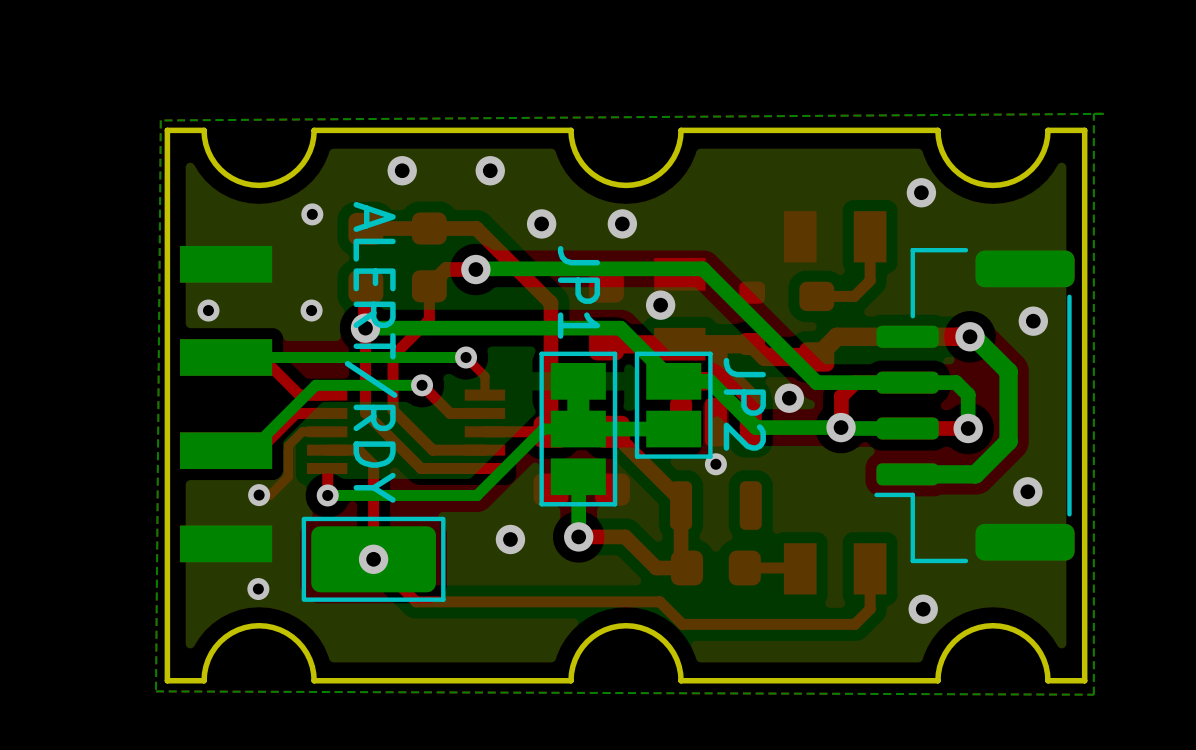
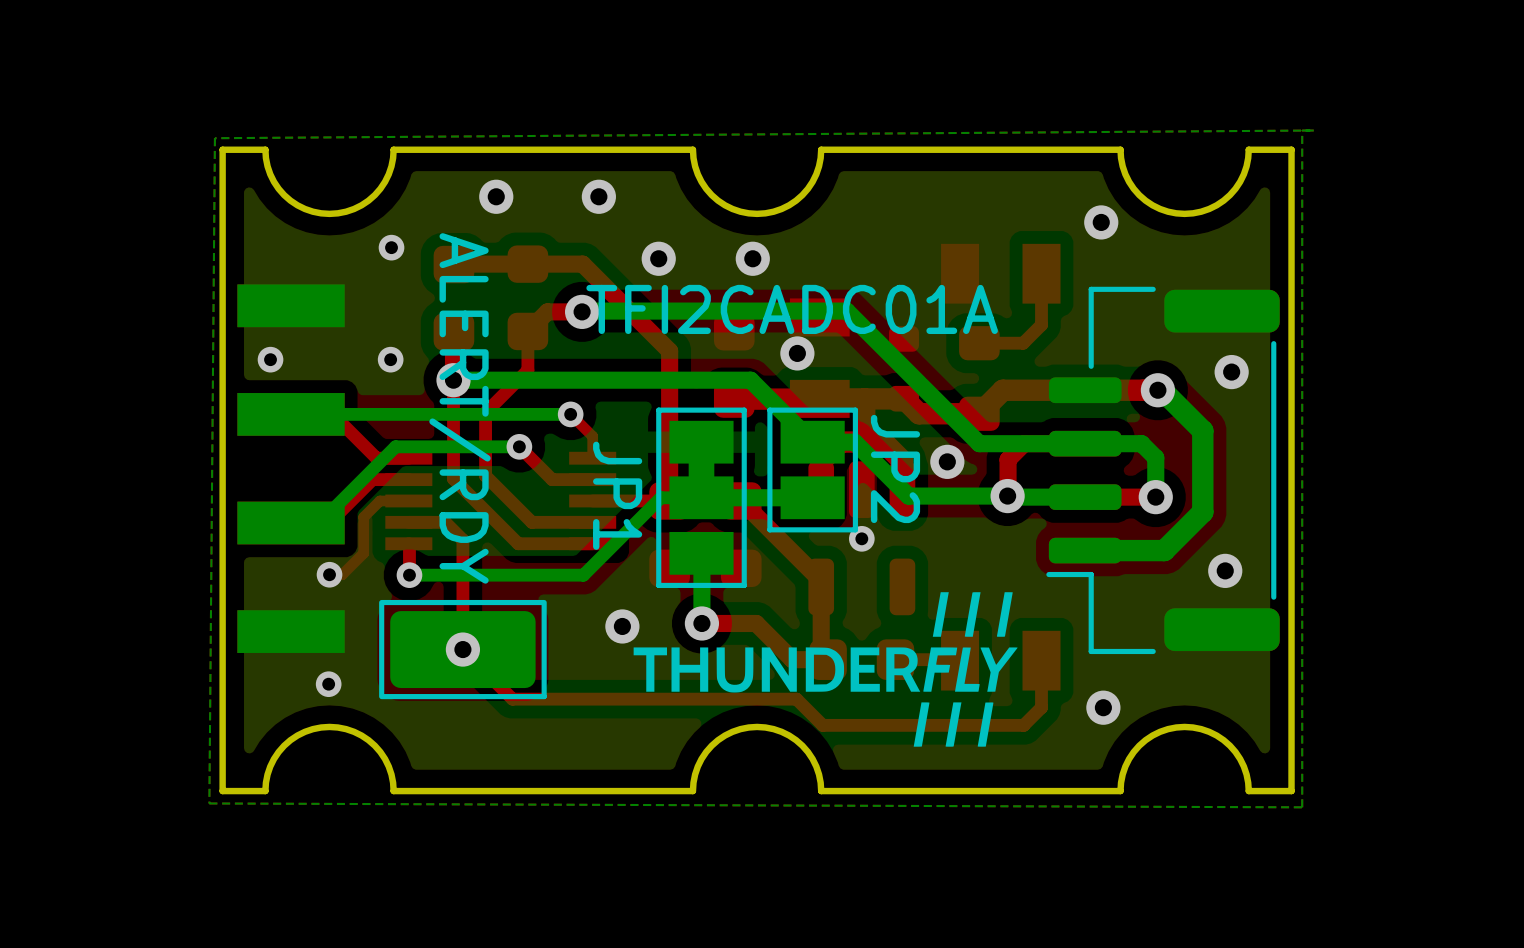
text: none -> TFI2CADC01A (792, 309)
JP1 name position: JP1 (578, 292) -> JP1 (617, 495)
drawing: none -> [633, 592, 1018, 747]

